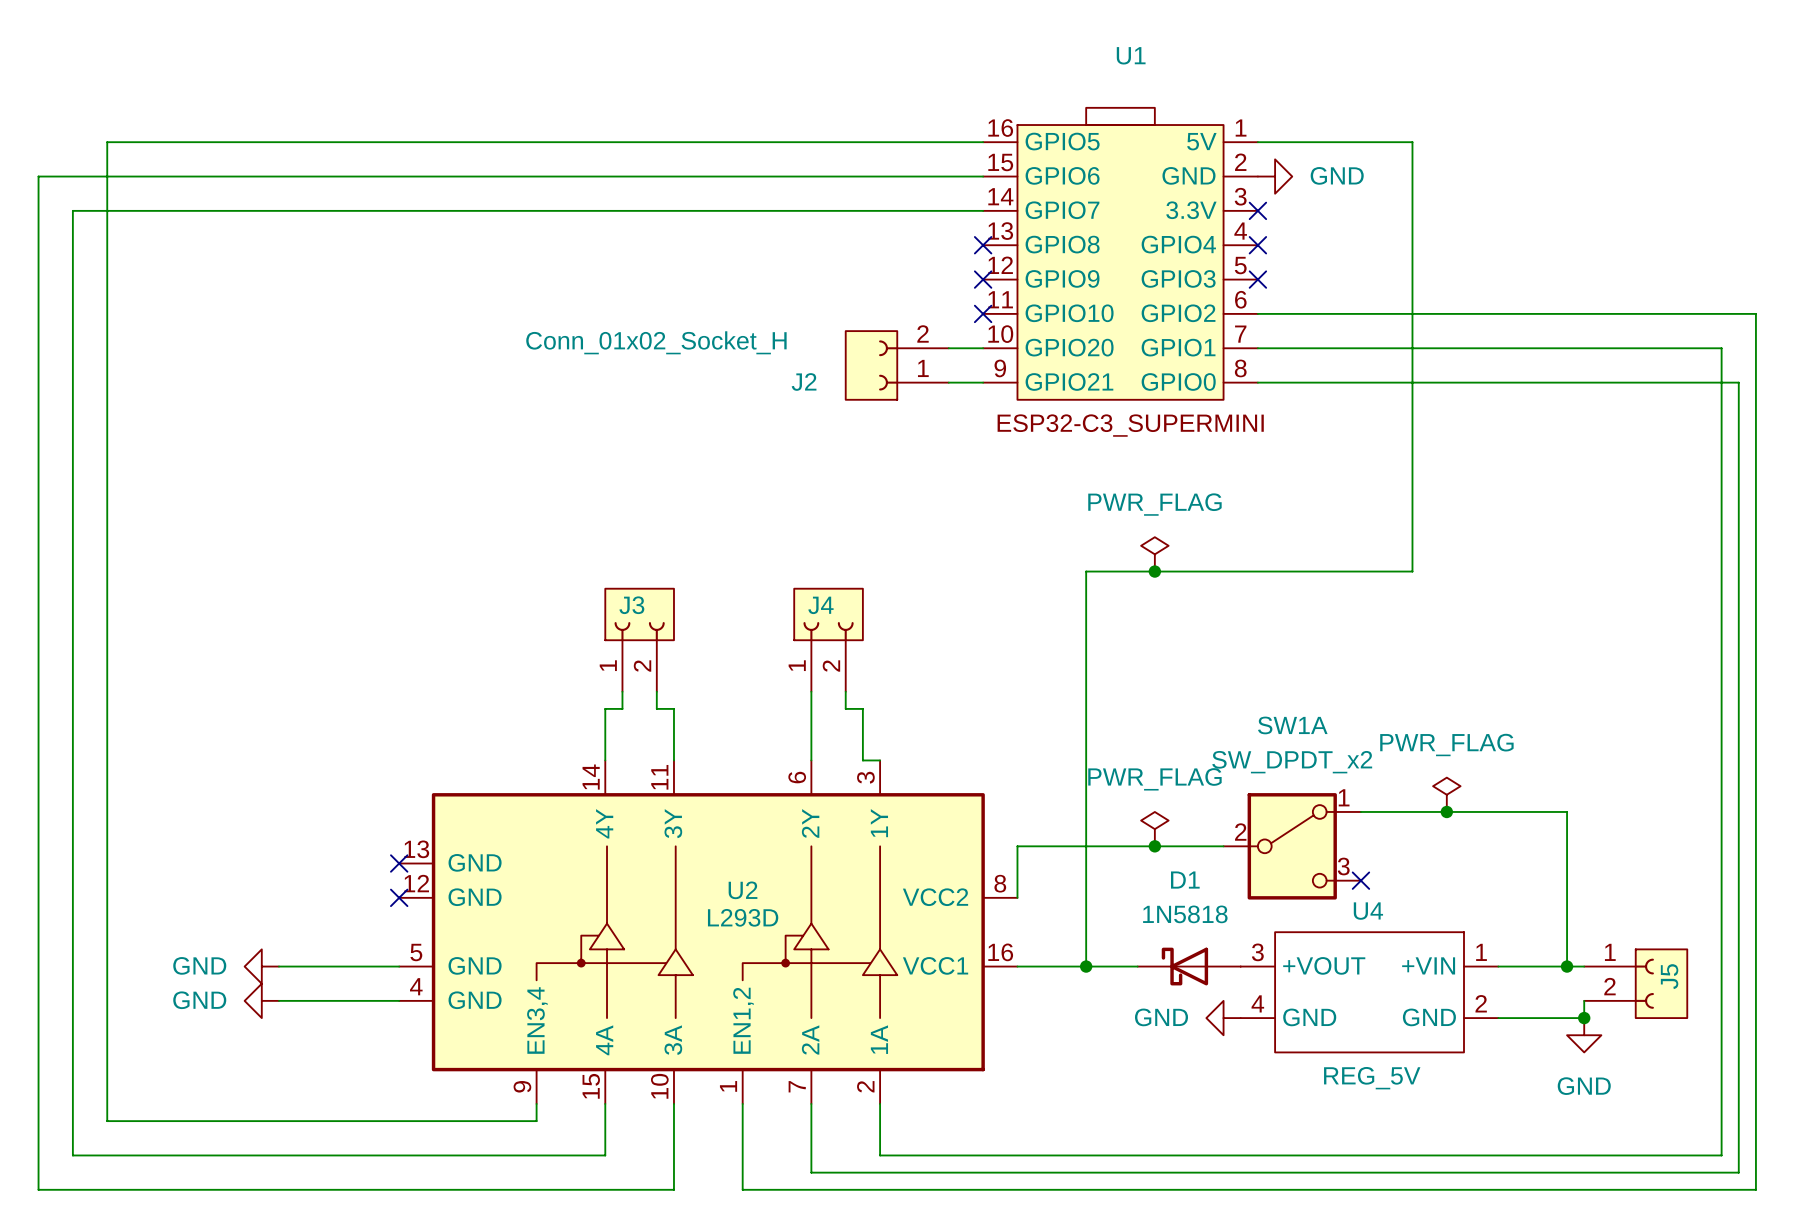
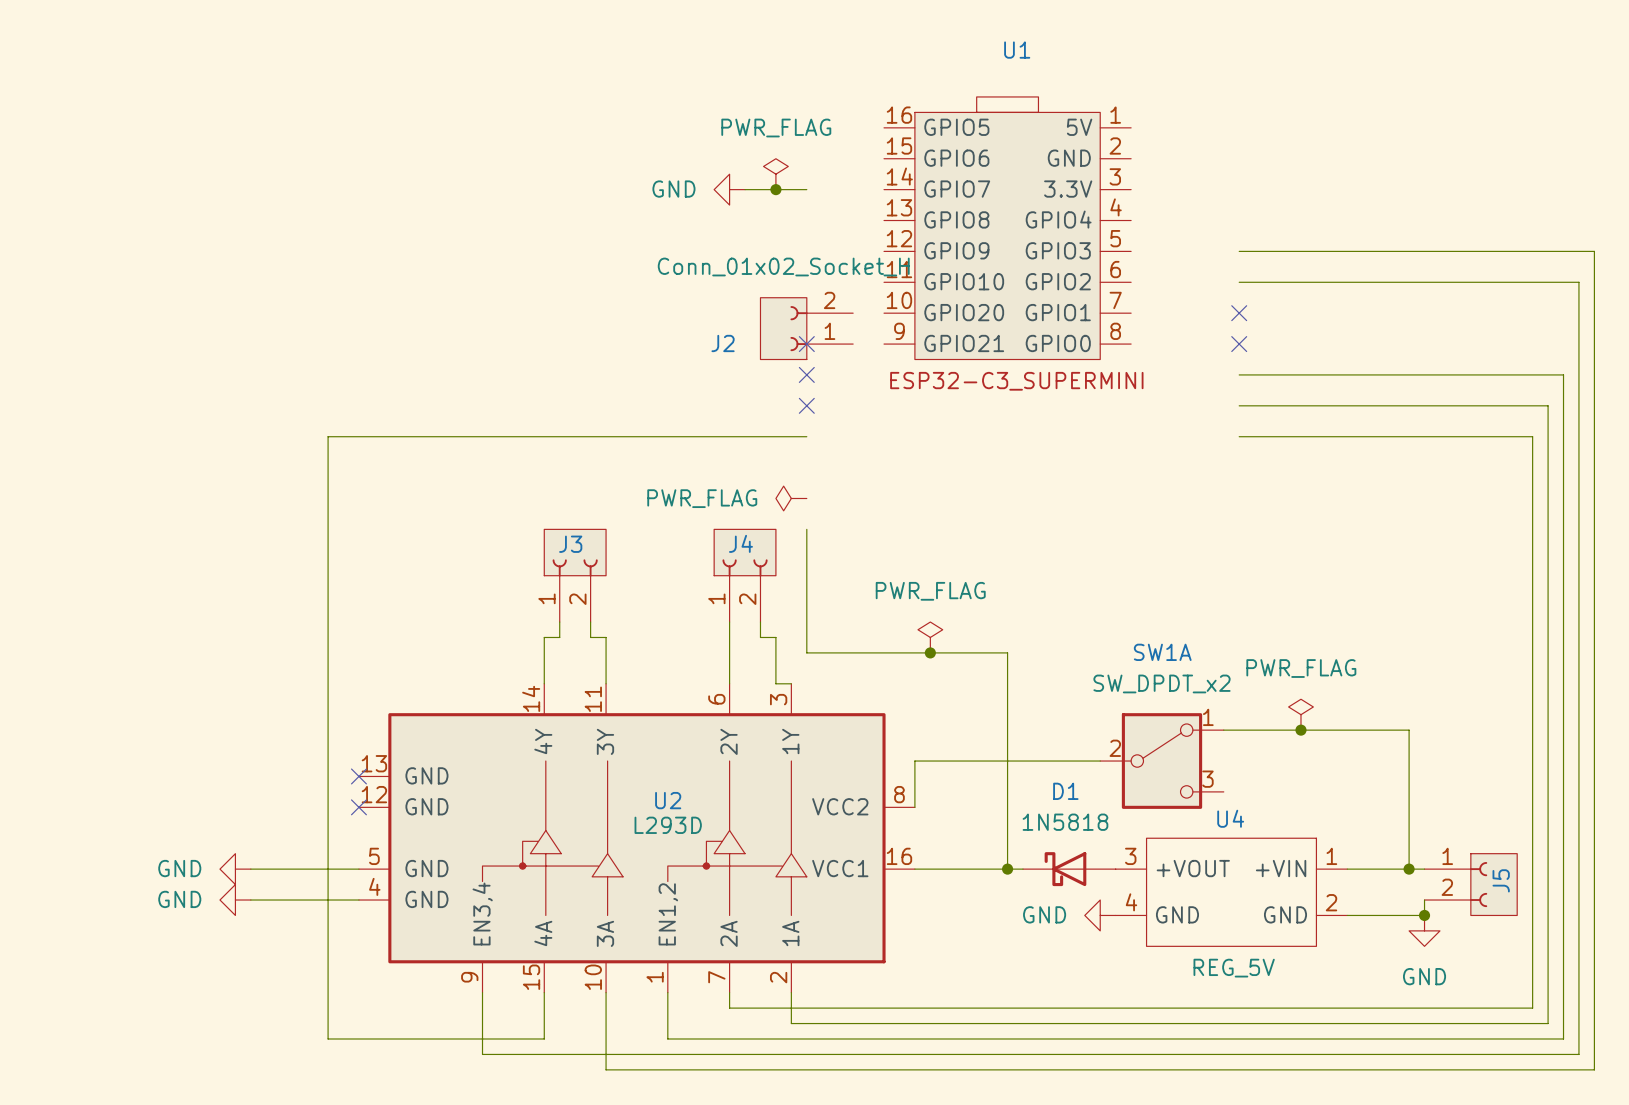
wire: (983, 142) (107, 142) (107, 1121) (536, 1121) -> none
wire: (1257, 142) (1412, 142) (1412, 571) (1086, 571) (1086, 966) -> none
wire: (983, 176) (38, 176) (38, 1189) (673, 1189) -> none
power symbol: GND (1275, 176) -> none
power symbol: none -> PWR_FLAG (775, 174)
power symbol: none -> GND (729, 189)
wire: (828, 210) (72, 210) (72, 1155) (364, 1155) -> (806, 436) (328, 436) (328, 1038)
junction: none -> (775, 189)
wire: (897, 210) (983, 210) -> none
no-connect mark: (1257, 210) -> none
no-connect mark: (983, 245) -> none
no-connect mark: (1257, 245) -> none
no-connect mark: (983, 279) -> none
no-connect mark: (1257, 279) -> none
wire: none -> (1239, 251) (1594, 251) (1594, 1069) (1578, 1069)
no-connect mark: (983, 313) -> none
wire: (1257, 313) (1378, 313) -> none
J2 value position: Conn_01x02_Socket_H (656, 342) -> Conn_01x02_Socket_H (783, 267)
wire: (948, 348) (983, 348) -> none
wire: (1257, 348) (1721, 348) (1721, 451) -> (1239, 405) (1548, 405)
no-connect mark: none -> (1239, 313)
no-connect mark: none -> (806, 344)
wire: (948, 382) (983, 382) -> none
wire: (1257, 382) (1738, 382) (1738, 416) -> (1239, 374) (1563, 374)
no-connect mark: none -> (1239, 344)
no-connect mark: none -> (806, 374)
no-connect mark: none -> (806, 405)
wire: none -> (1239, 436) (1532, 436) (1532, 1008) (729, 1008)
power symbol: none -> PWR_FLAG (791, 498)
power symbol: PWR_FLAG (1154, 554) -> none
junction: (1154, 571) -> none
wire: none -> (806, 529) (806, 652) (1007, 652) (1007, 869)
power symbol: none -> PWR_FLAG (930, 637)
junction: none -> (930, 652)
power symbol: PWR_FLAG (1154, 829) -> none
junction: (1154, 846) -> none
no-connect mark: (1360, 880) -> none
junction position: (1086, 966) -> (1007, 869)
wire: (811, 1121) (811, 1172) -> (482, 1008) (482, 1054) (729, 1054)
wire: (880, 1138) (880, 1155) -> (667, 1038) (791, 1038)
wire: none -> (791, 1023) (1548, 1023)
wire: (1721, 1138) (1721, 1155) -> (1563, 1038) (1548, 1038)
wire: (742, 1155) (742, 1189) -> (606, 1069) (667, 1069)
wire: (1738, 1155) (1738, 1172) -> none
wire: (1755, 1172) (1755, 1189) -> (1578, 1054) (1563, 1054)

